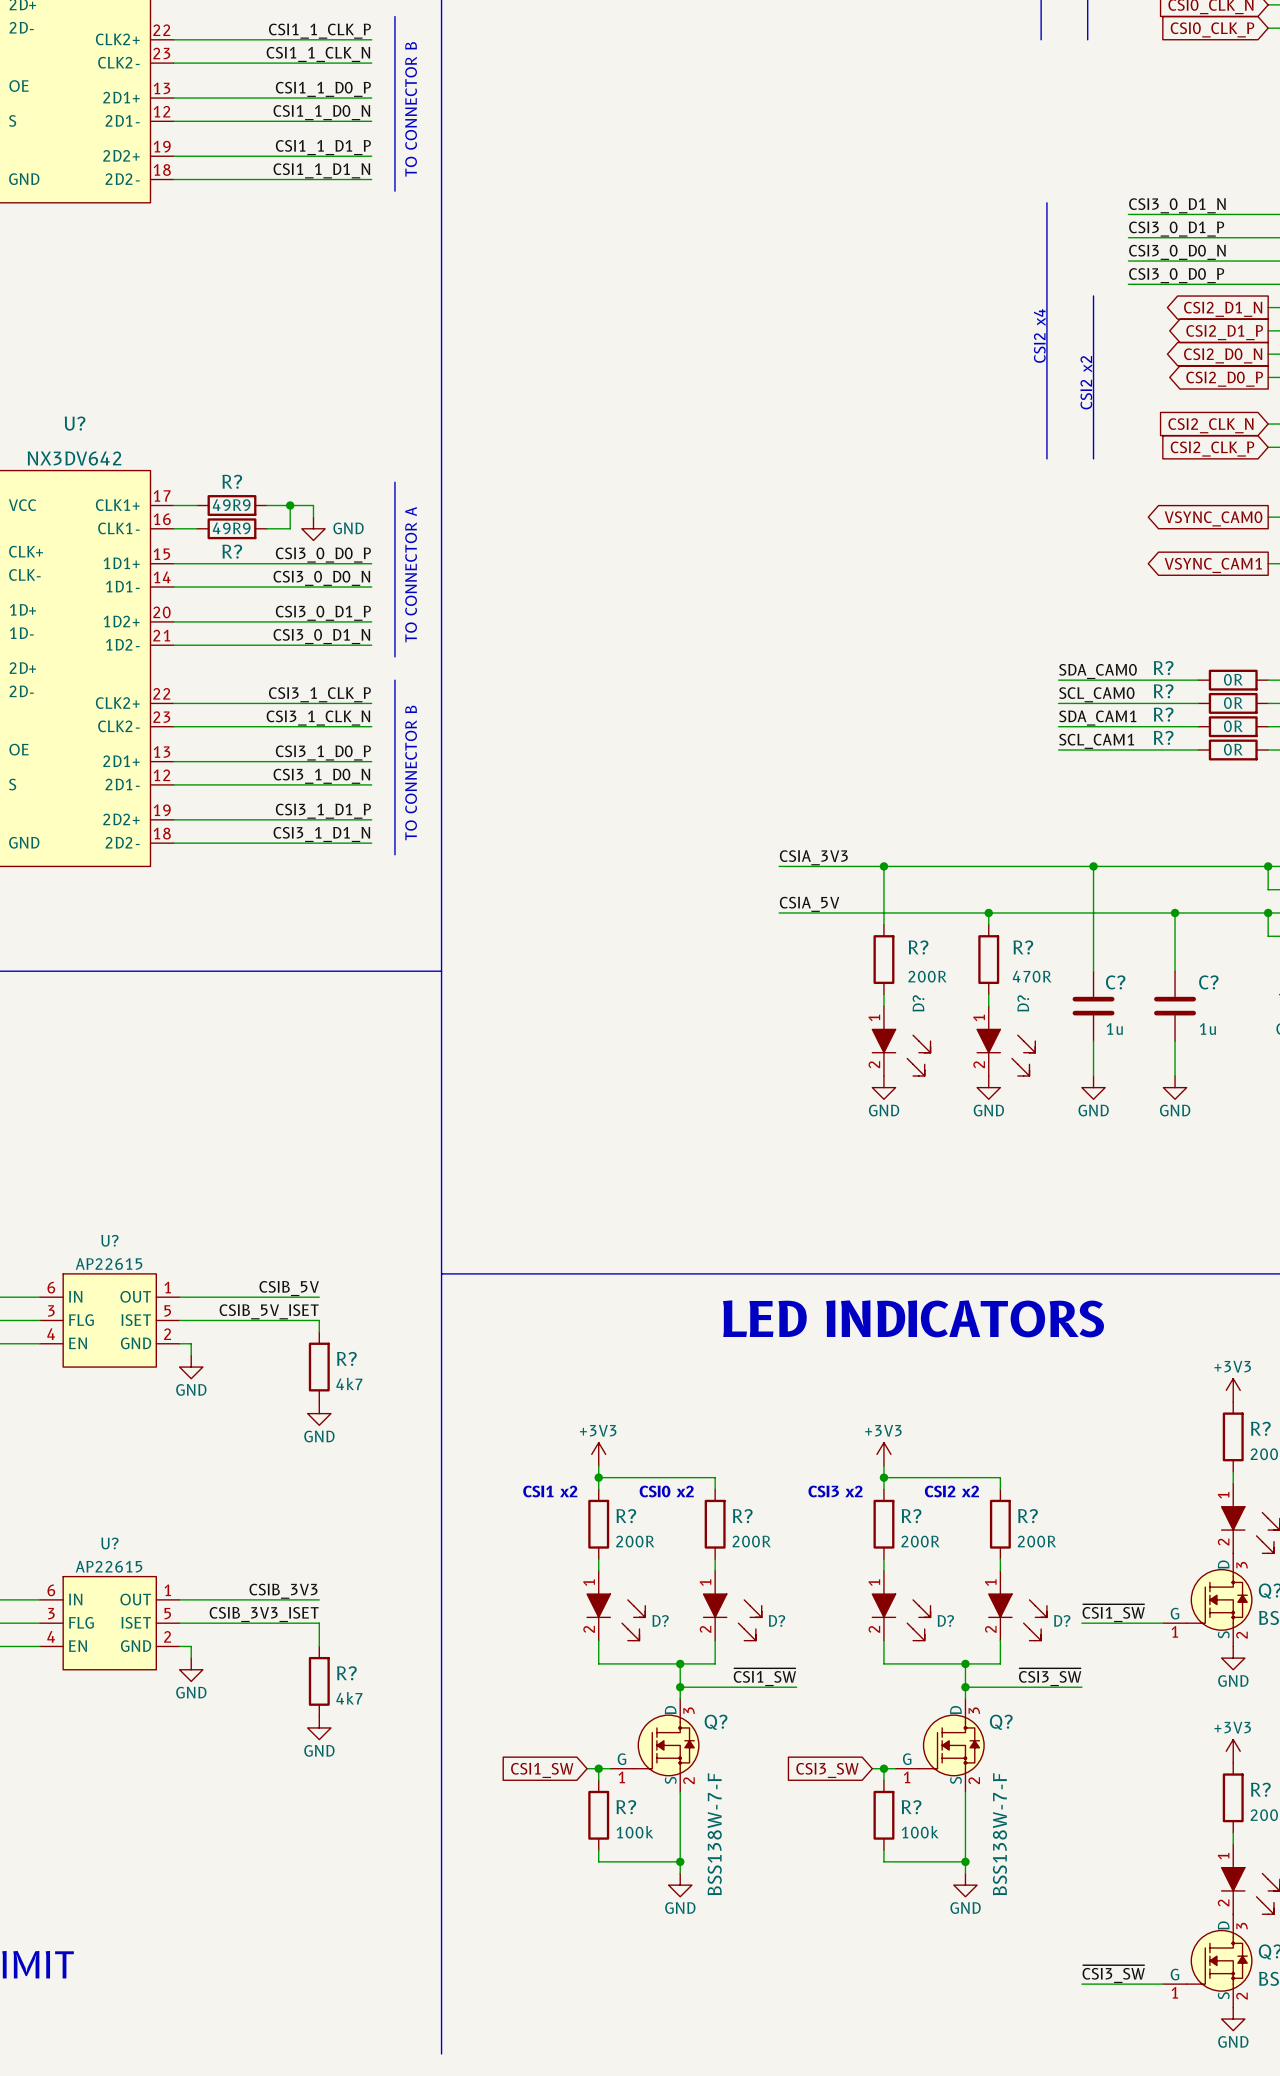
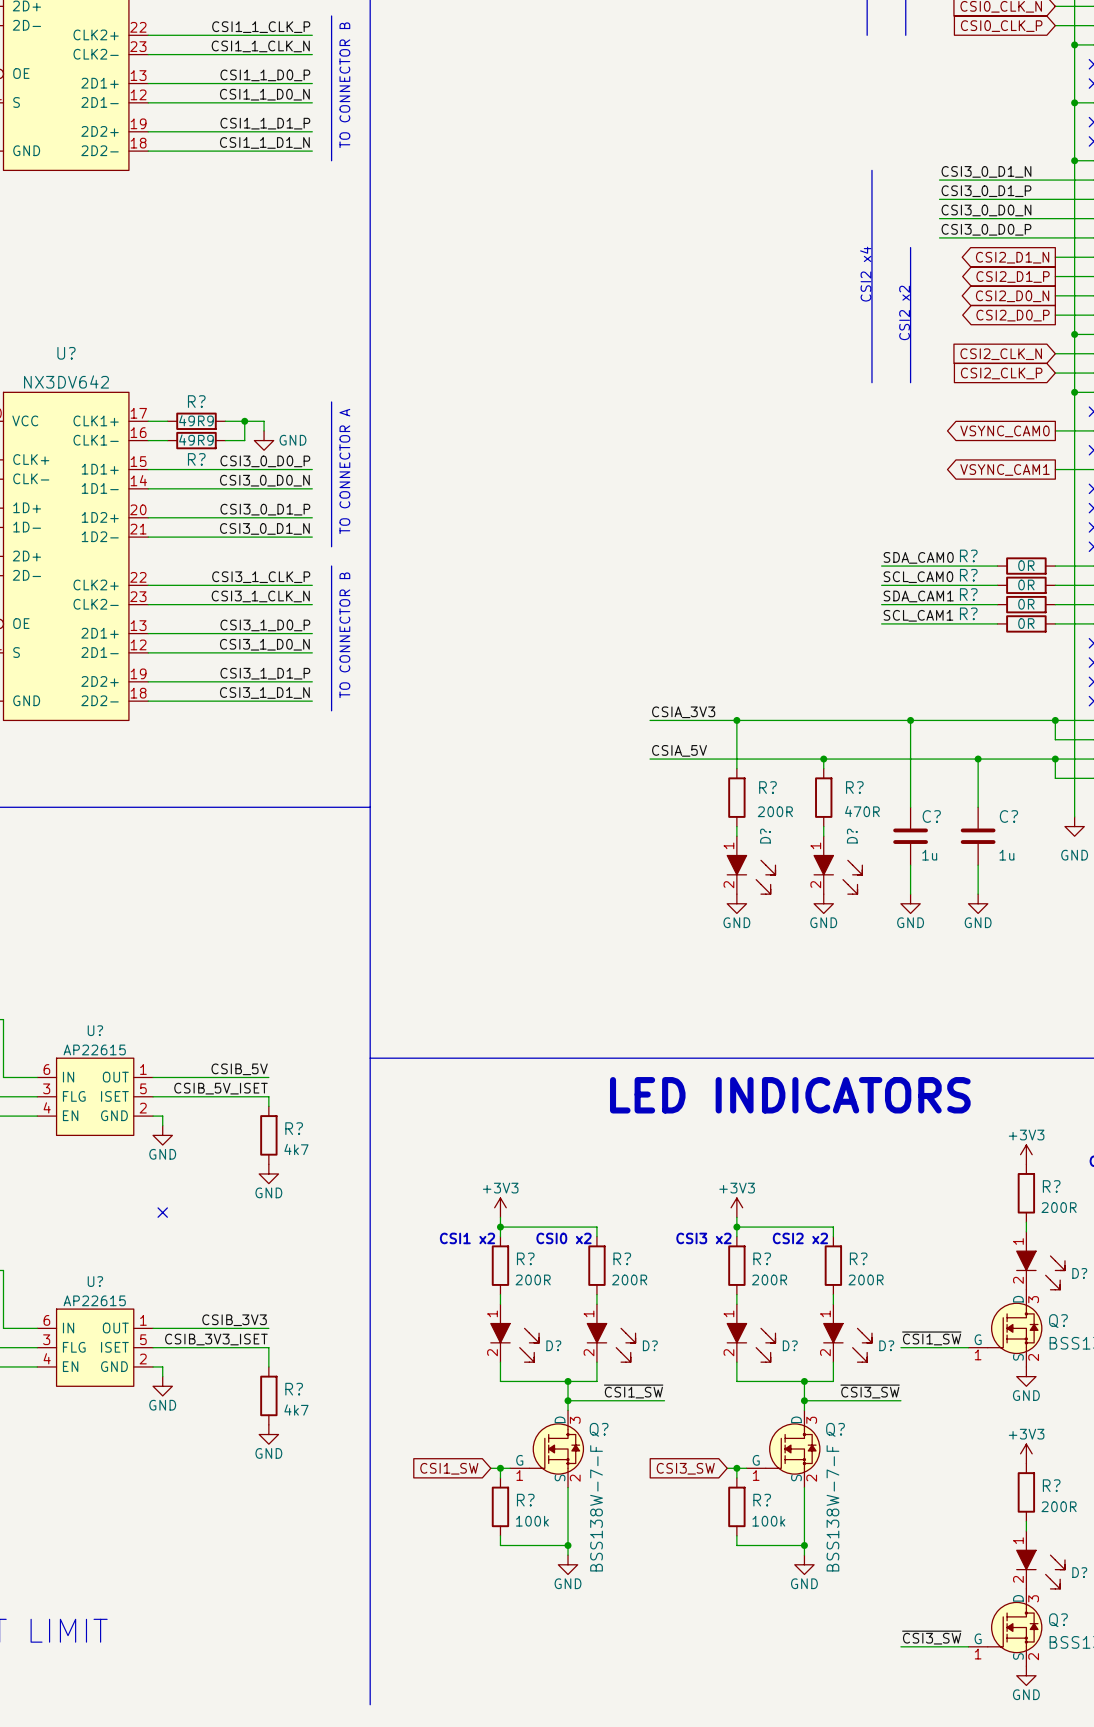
no-connect mark: none -> (162, 1212)

